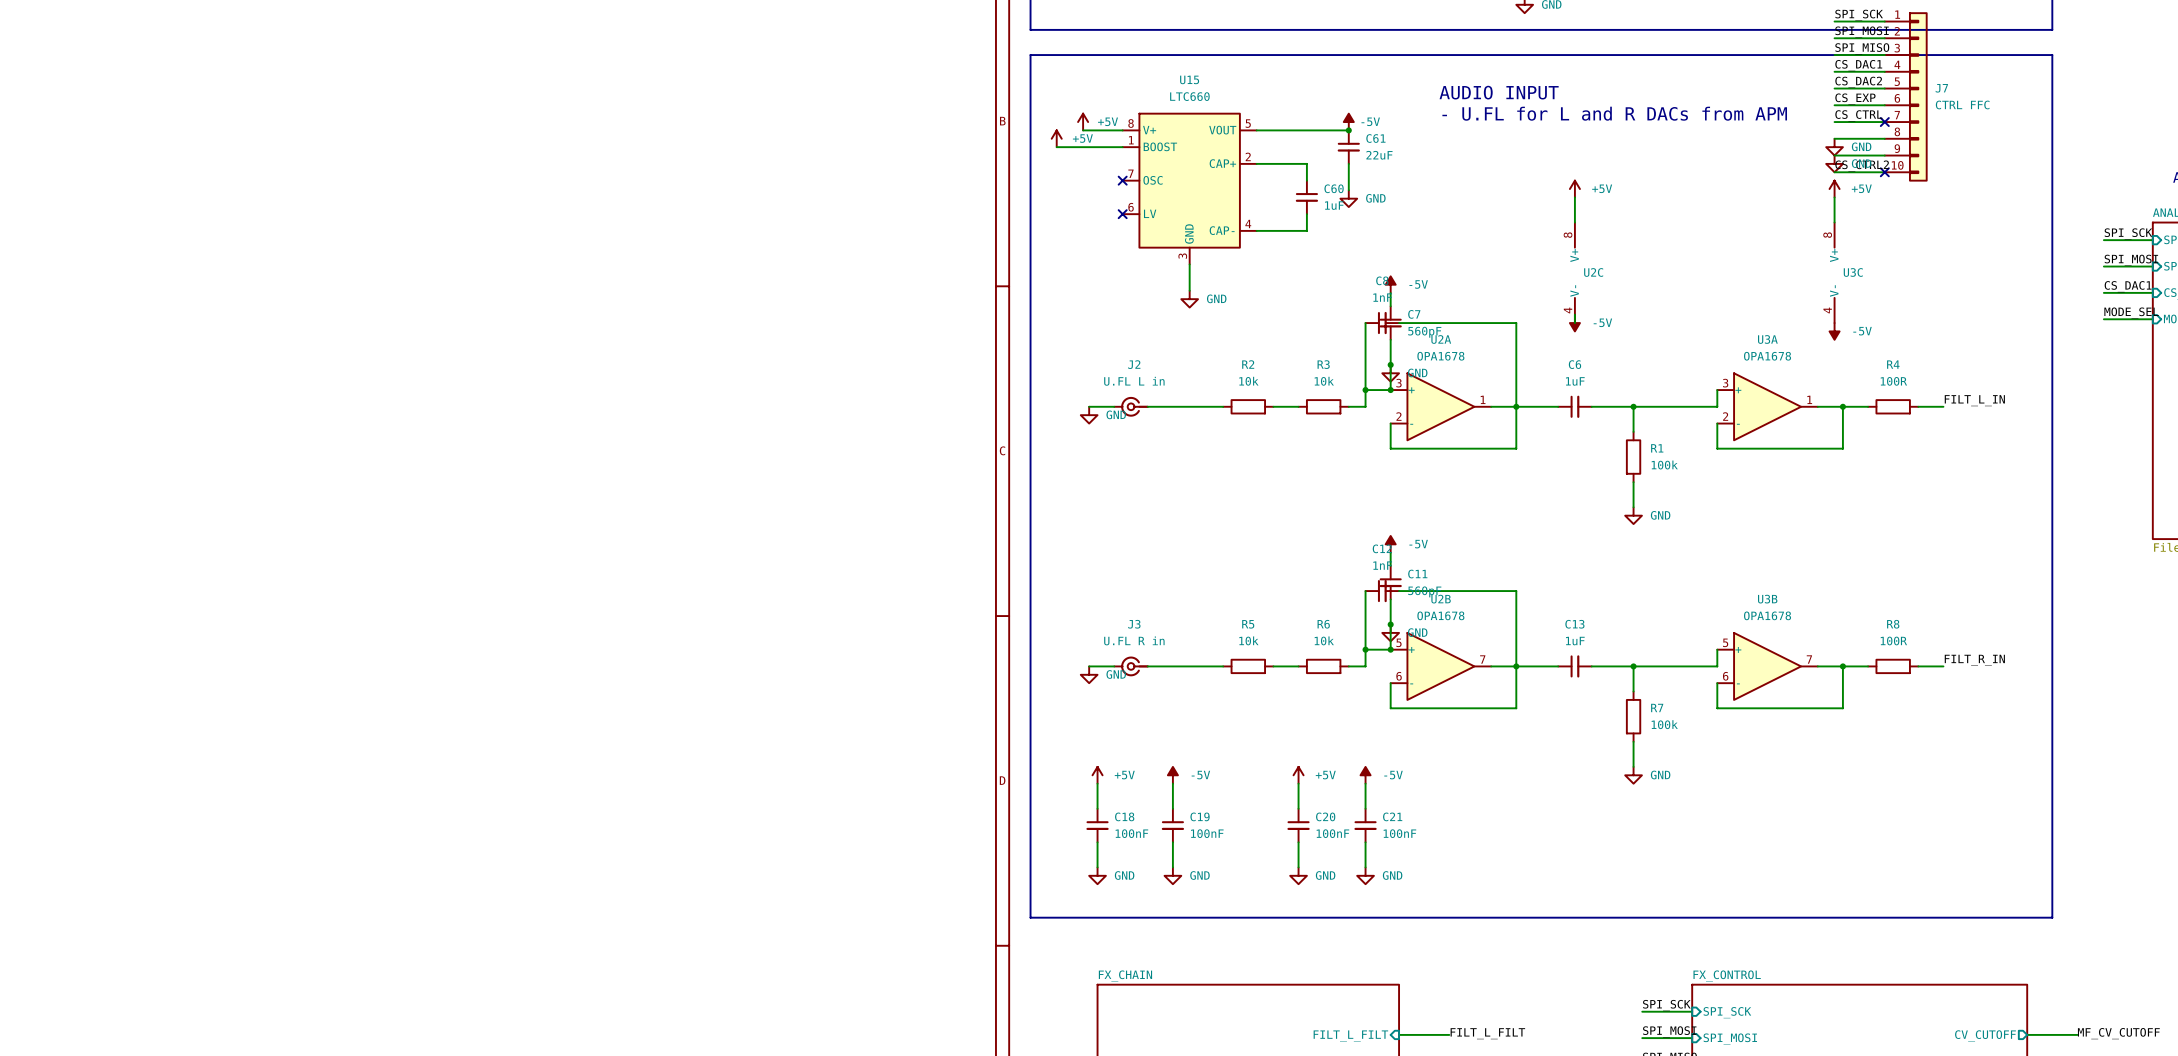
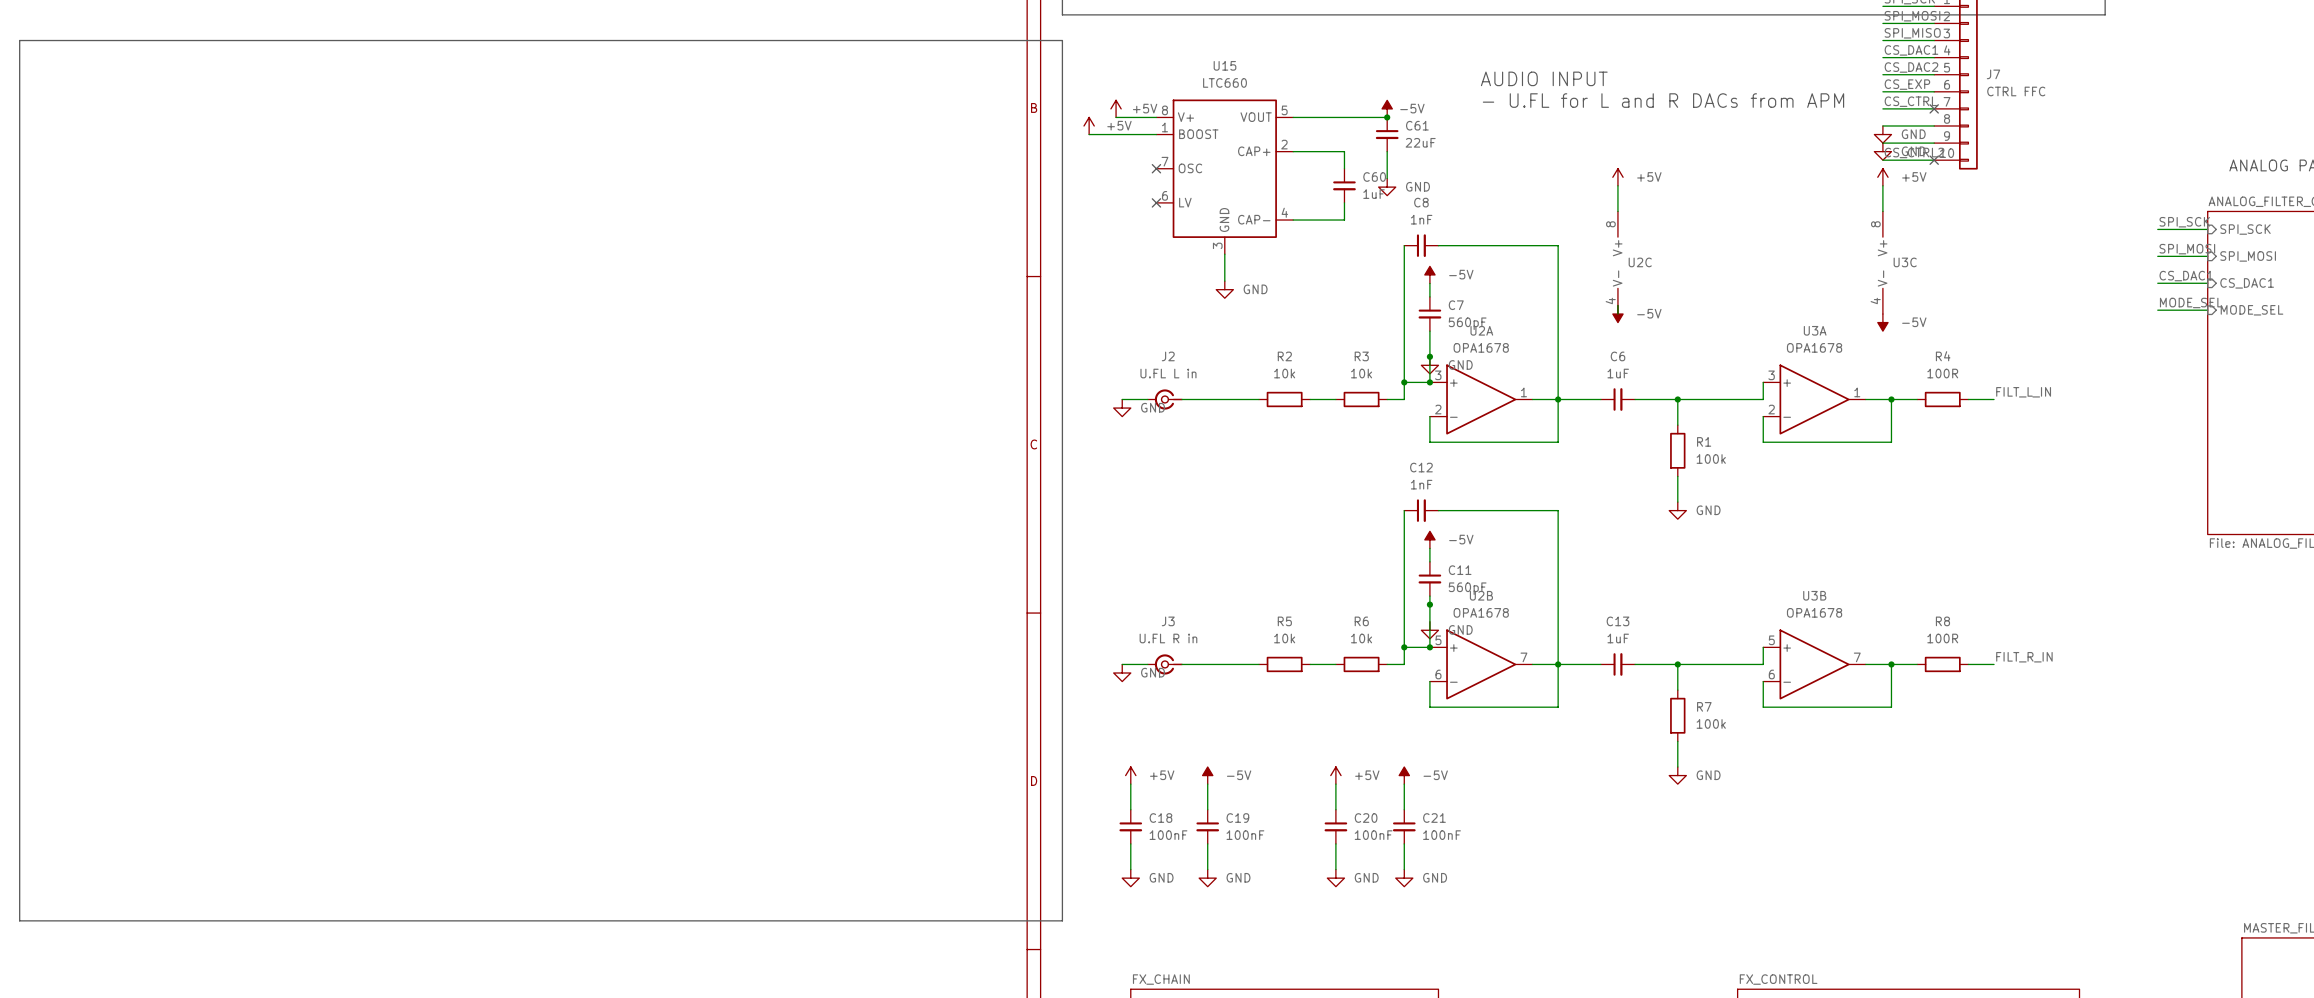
line: (1030, 55) (2052, 55) (2052, 917) (1030, 917) -> (1062, 40) (19, 40) (19, 920) (1062, 920)
wire: none -> (1404, 245) (1404, 314)
C8 position: (1382, 323) -> (1421, 245)
wire: (1399, 323) (1516, 323) -> (1438, 245) (1558, 245) (1558, 314)
wire: none -> (1404, 510) (1404, 587)
C12 position: (1382, 591) -> (1421, 510)
wire: (1399, 591) (1516, 591) -> (1438, 510) (1558, 510) (1558, 587)
junction position: (1390, 624) -> (1429, 604)

